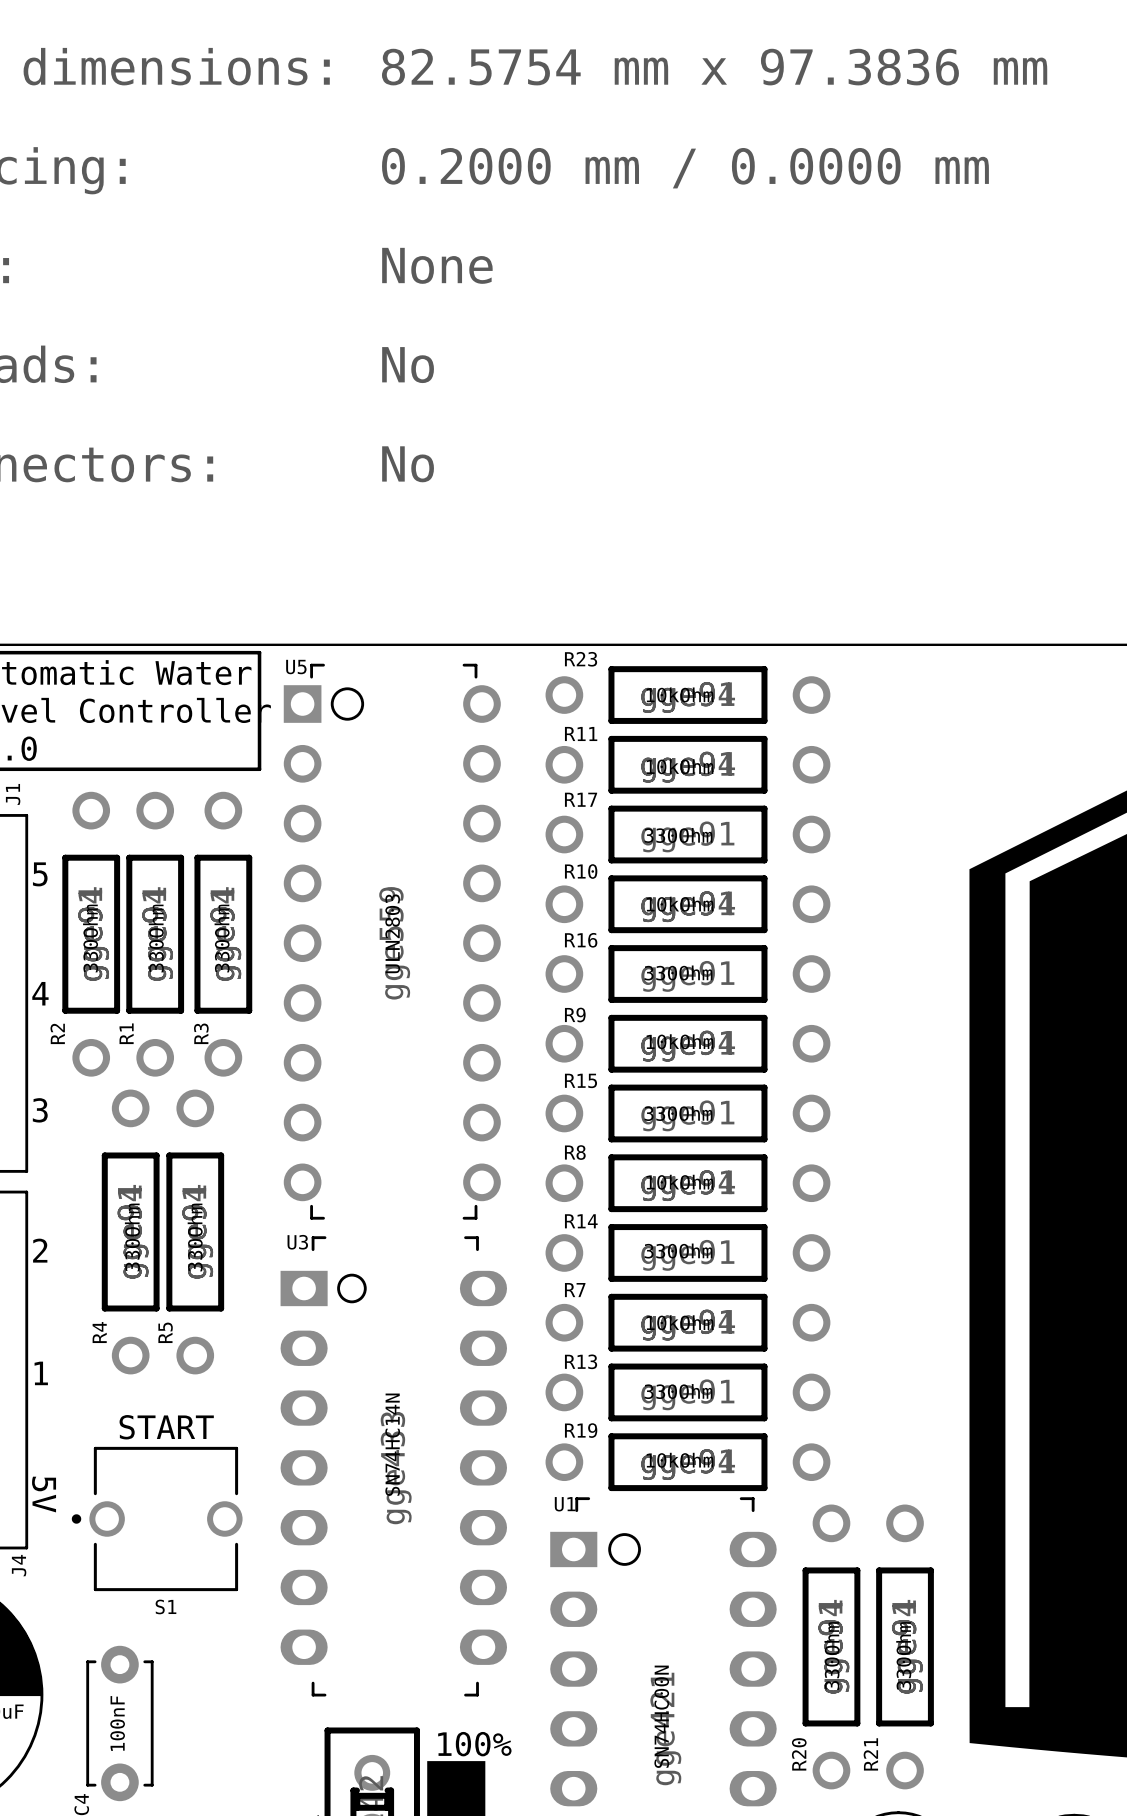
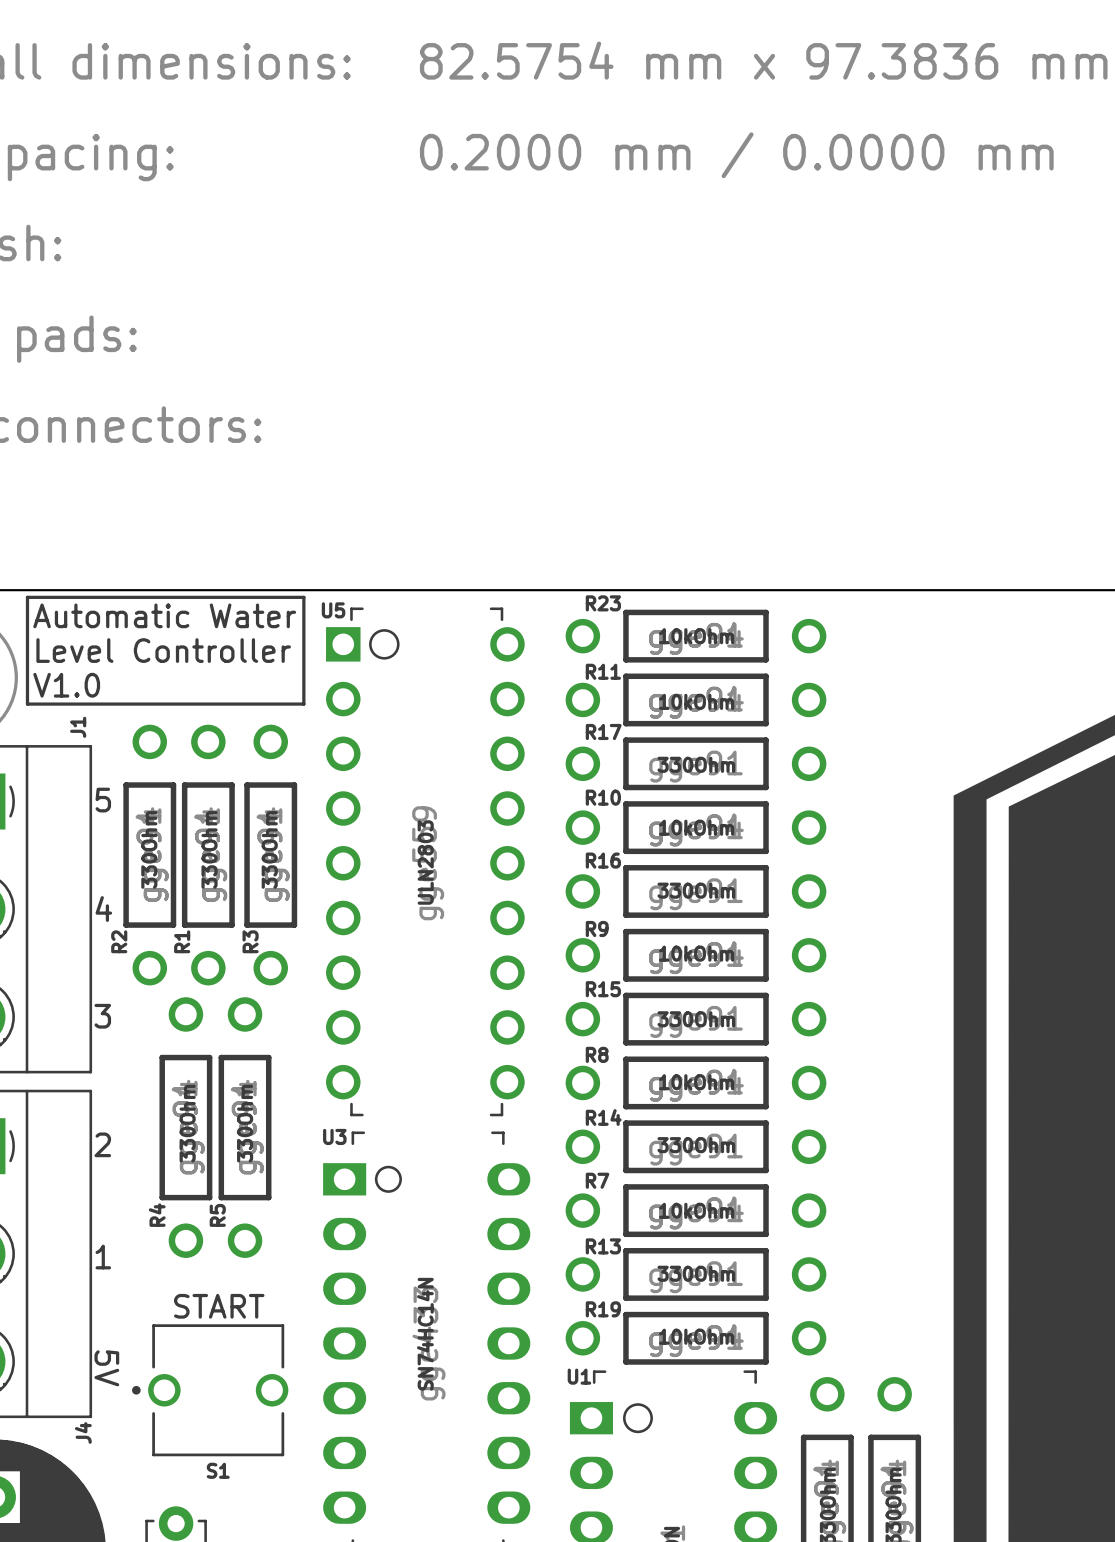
text: None (437, 265) -> none
text: No (408, 365) -> none
text: No (408, 464) -> none

